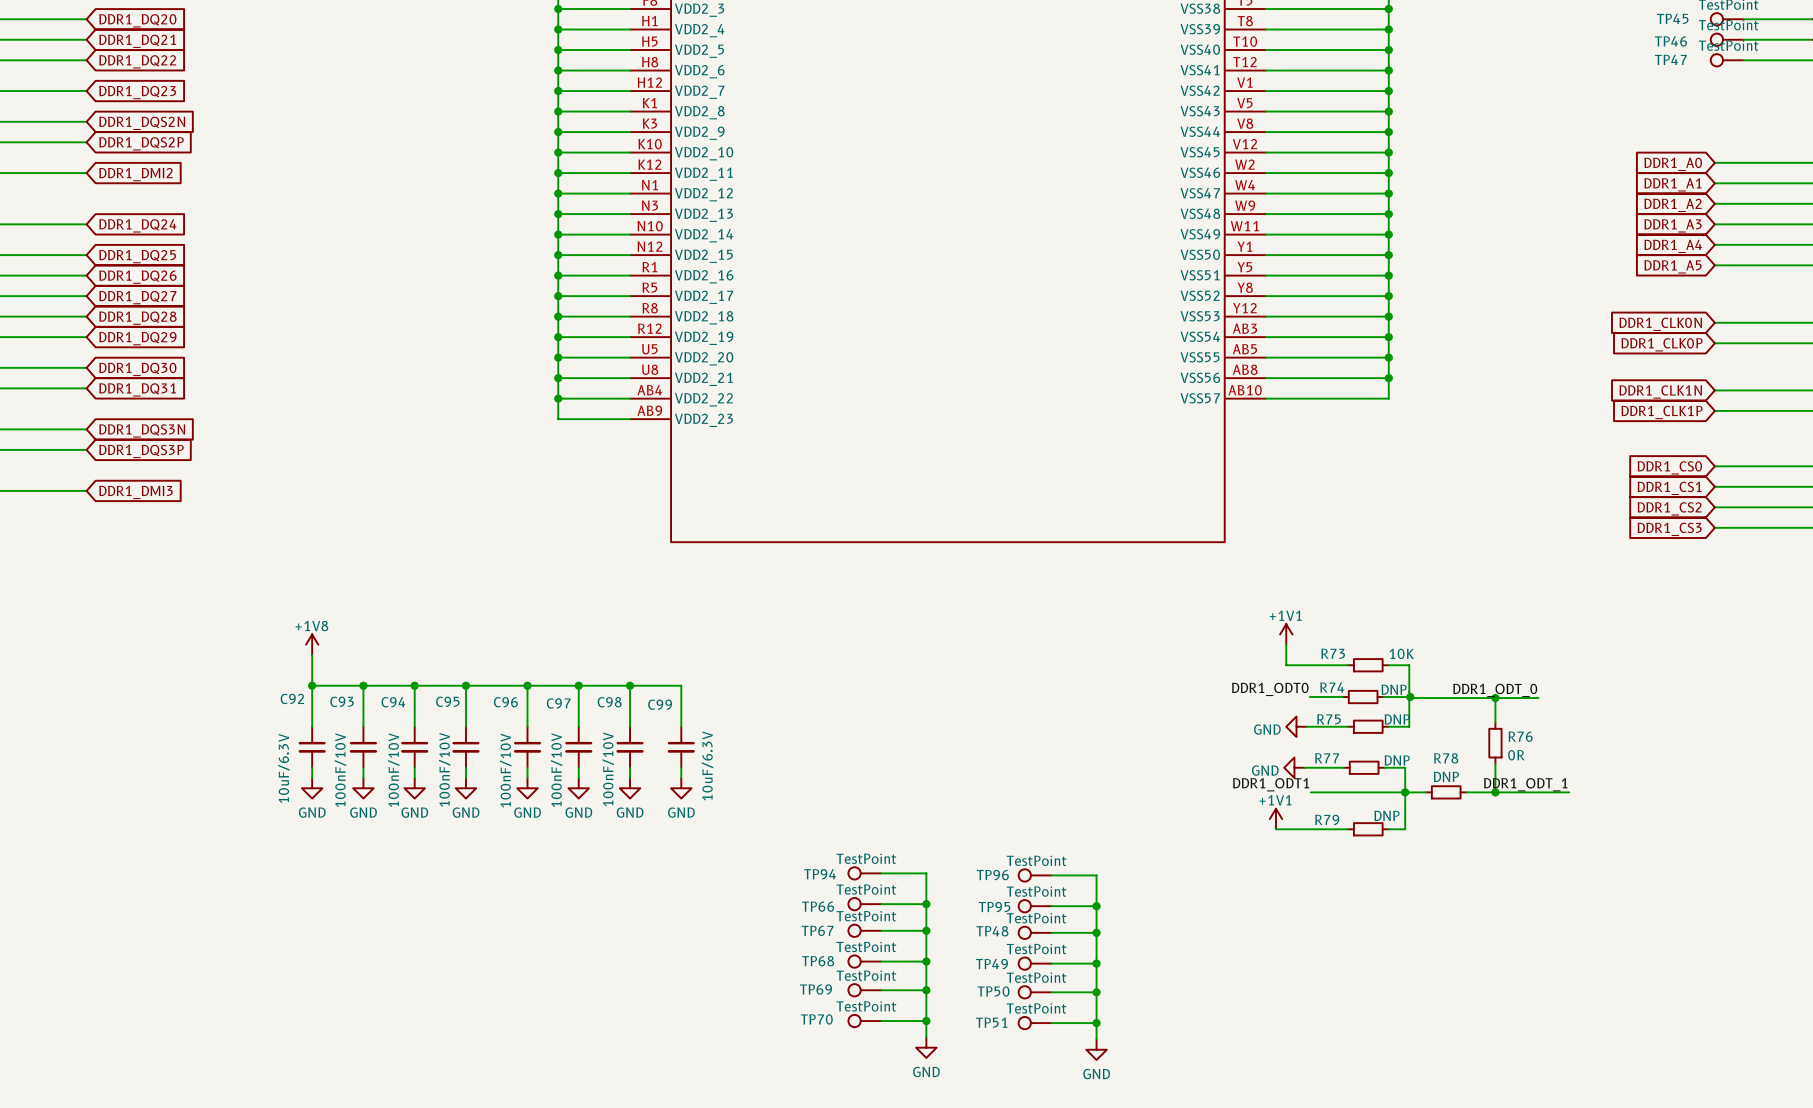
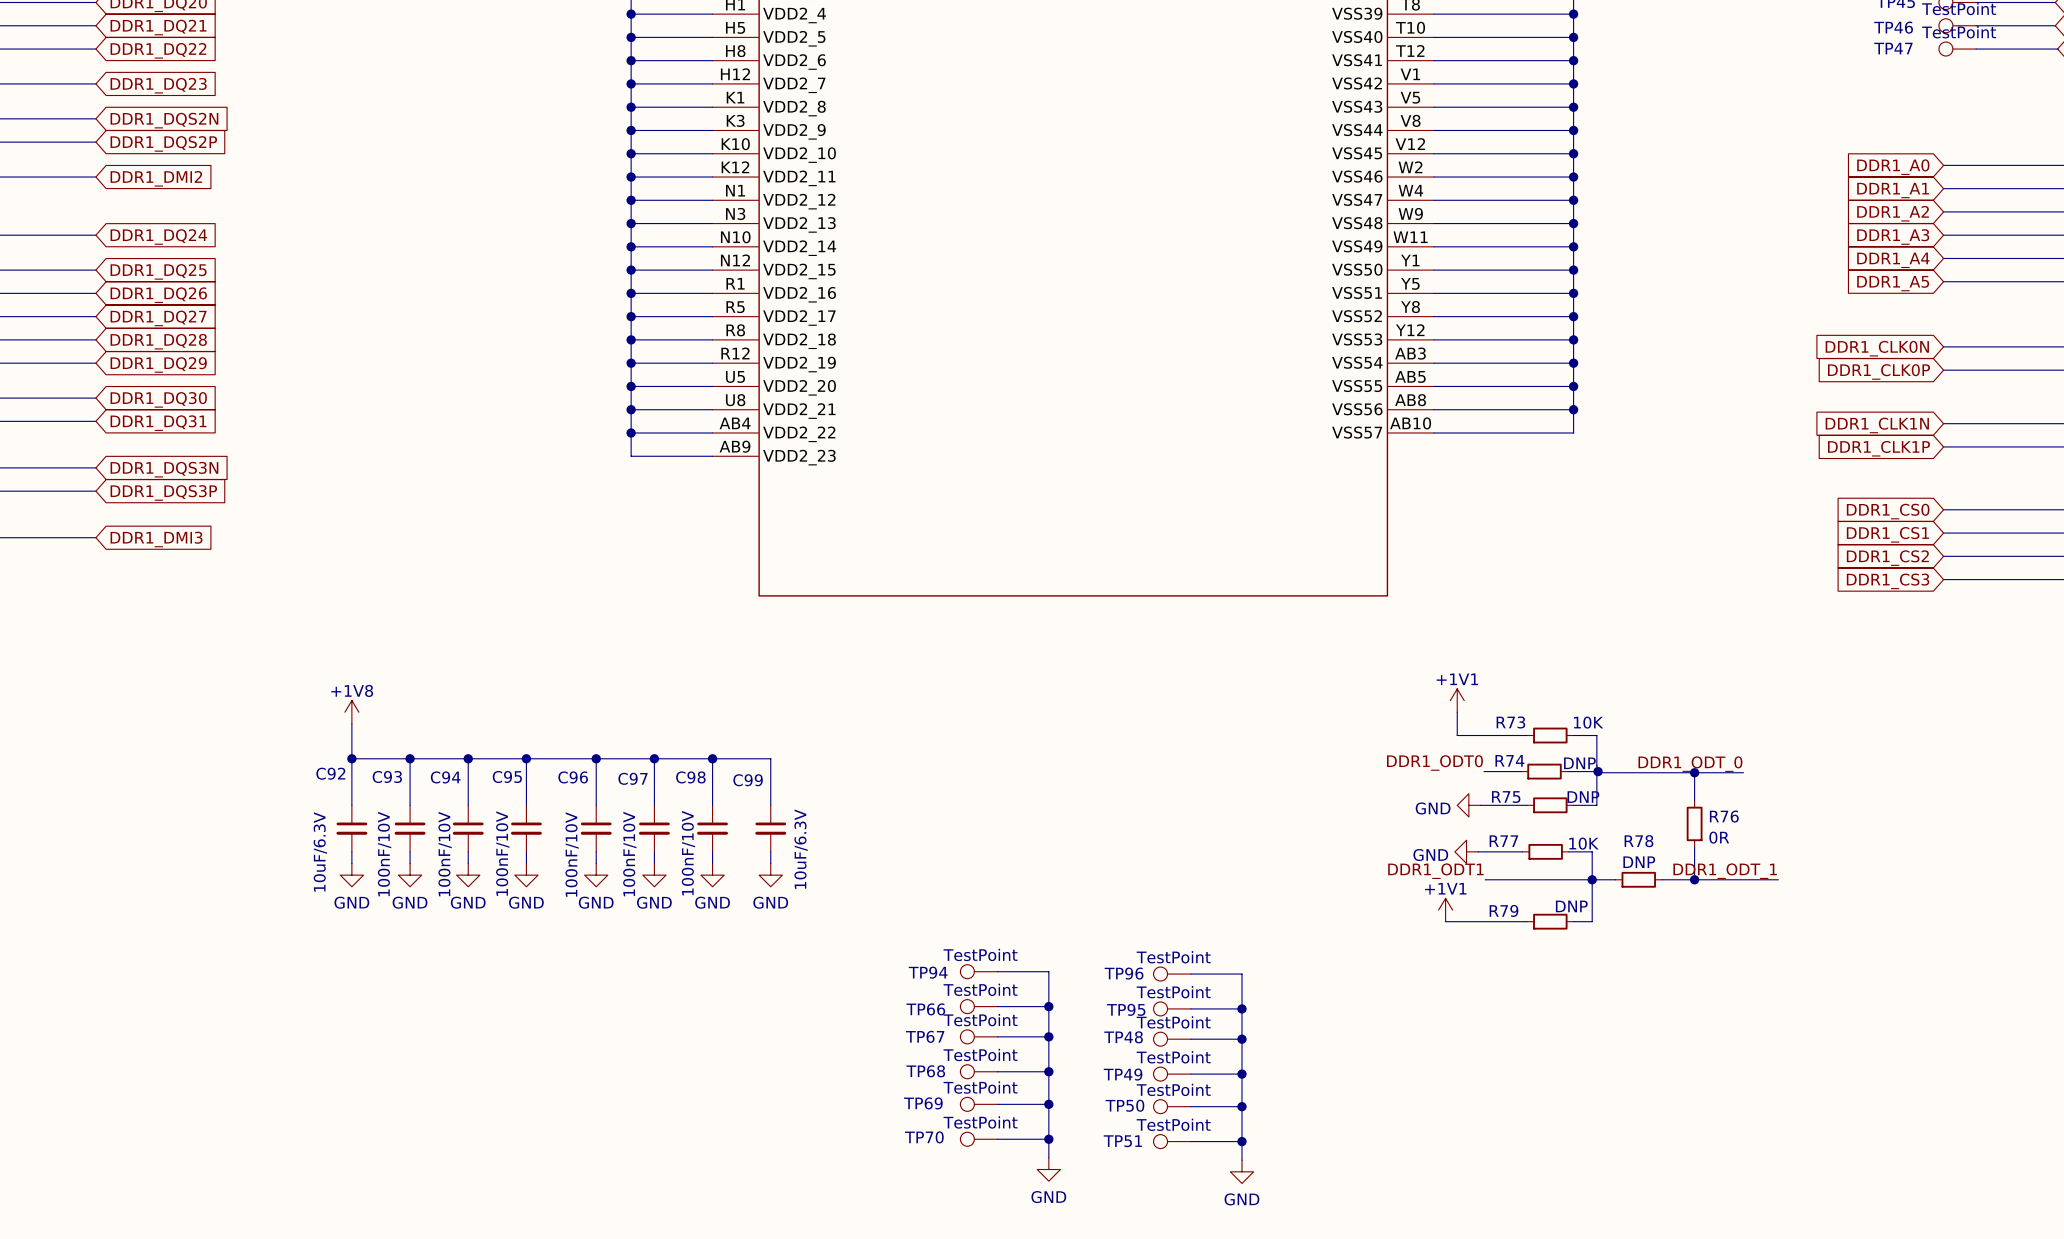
R77 value: DNP (1397, 760) -> 10K (1583, 843)

